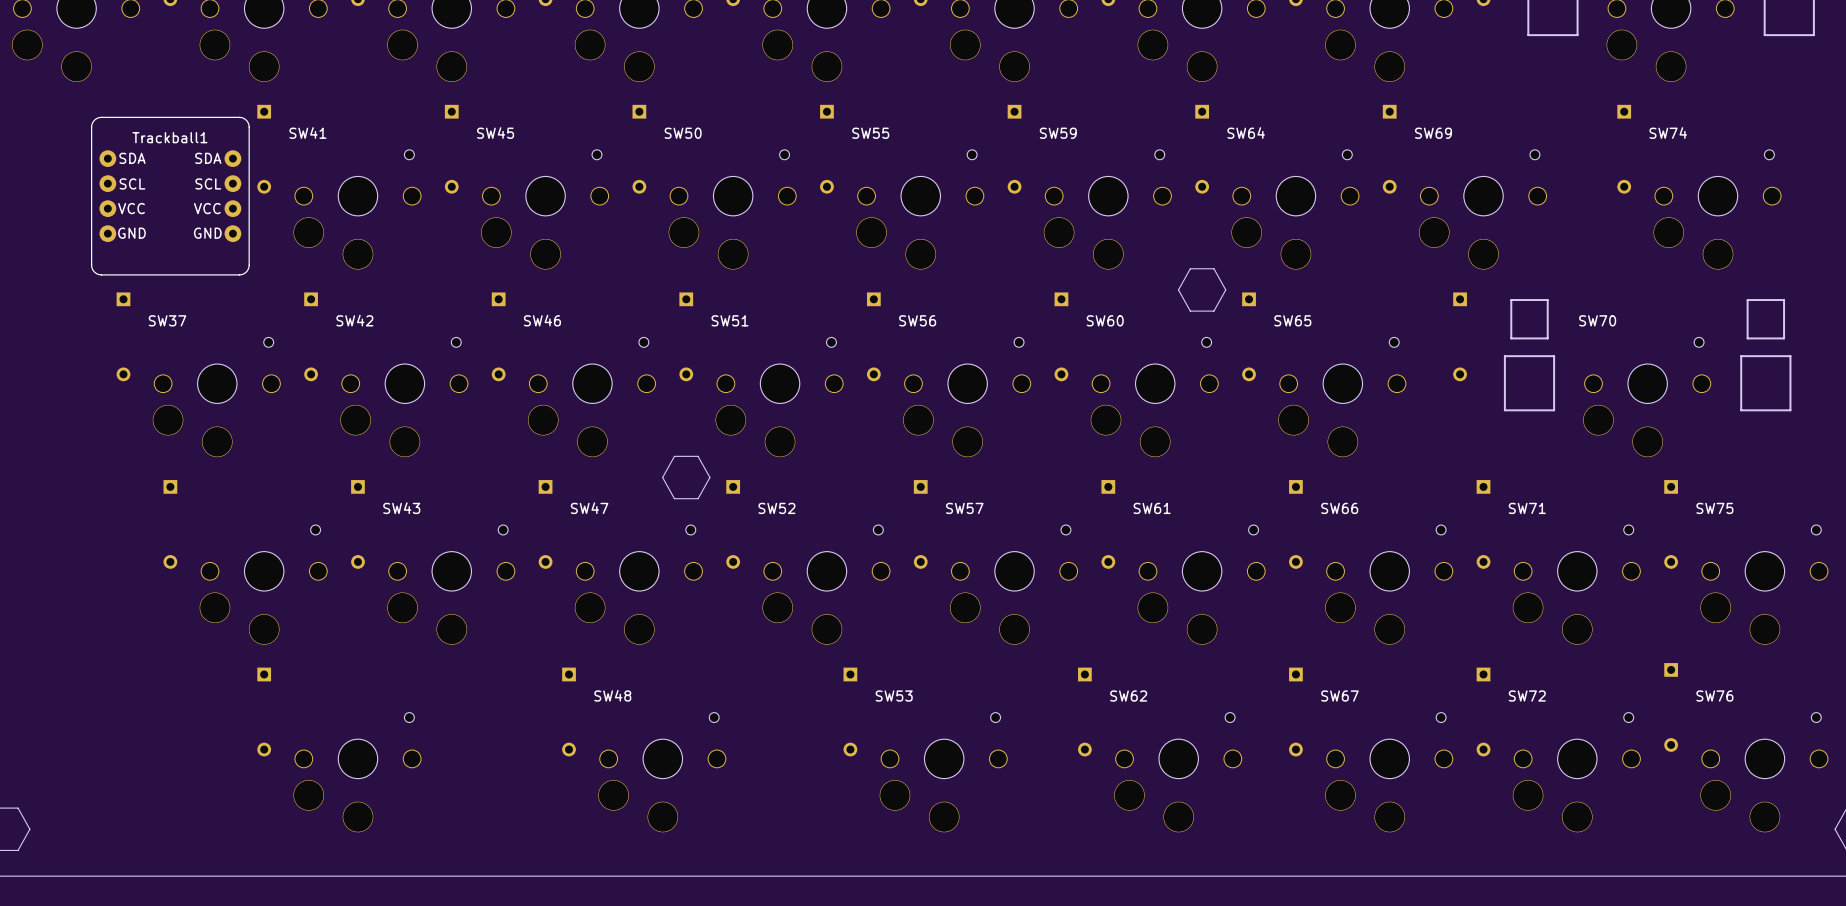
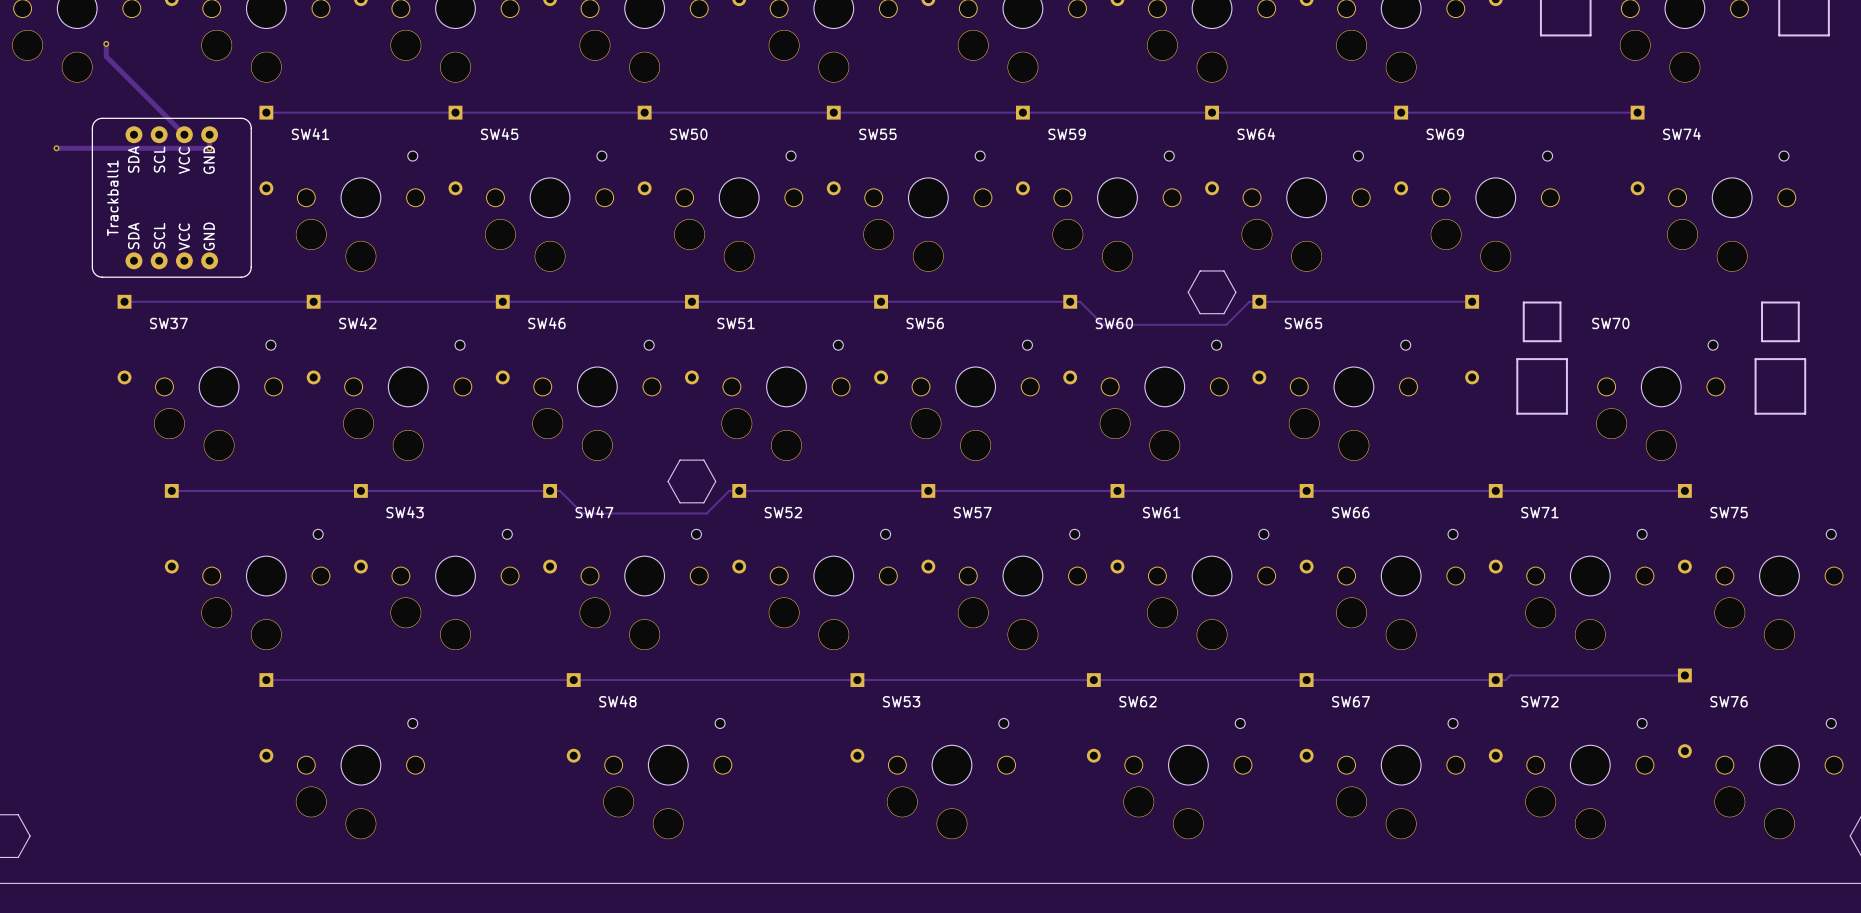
track: none -> (106, 43) (106, 56) (184, 134)
via: none -> (106, 43)
track: none -> (266, 112) (1637, 112)
track: none -> (209, 134) (209, 148) (56, 148)
via: none -> (56, 148)
via: none -> (209, 148)
Trackball1 rotation: 0° (170, 196) -> 90° counterclockwise (171, 197)
track: none -> (124, 301) (1080, 301) (1103, 324) (1226, 324) (1249, 301) (1472, 301)
track: none -> (171, 490) (560, 490) (582, 513) (706, 513) (729, 490) (1684, 490)
track: none -> (1684, 675) (1510, 675) (1505, 680) (266, 680)

